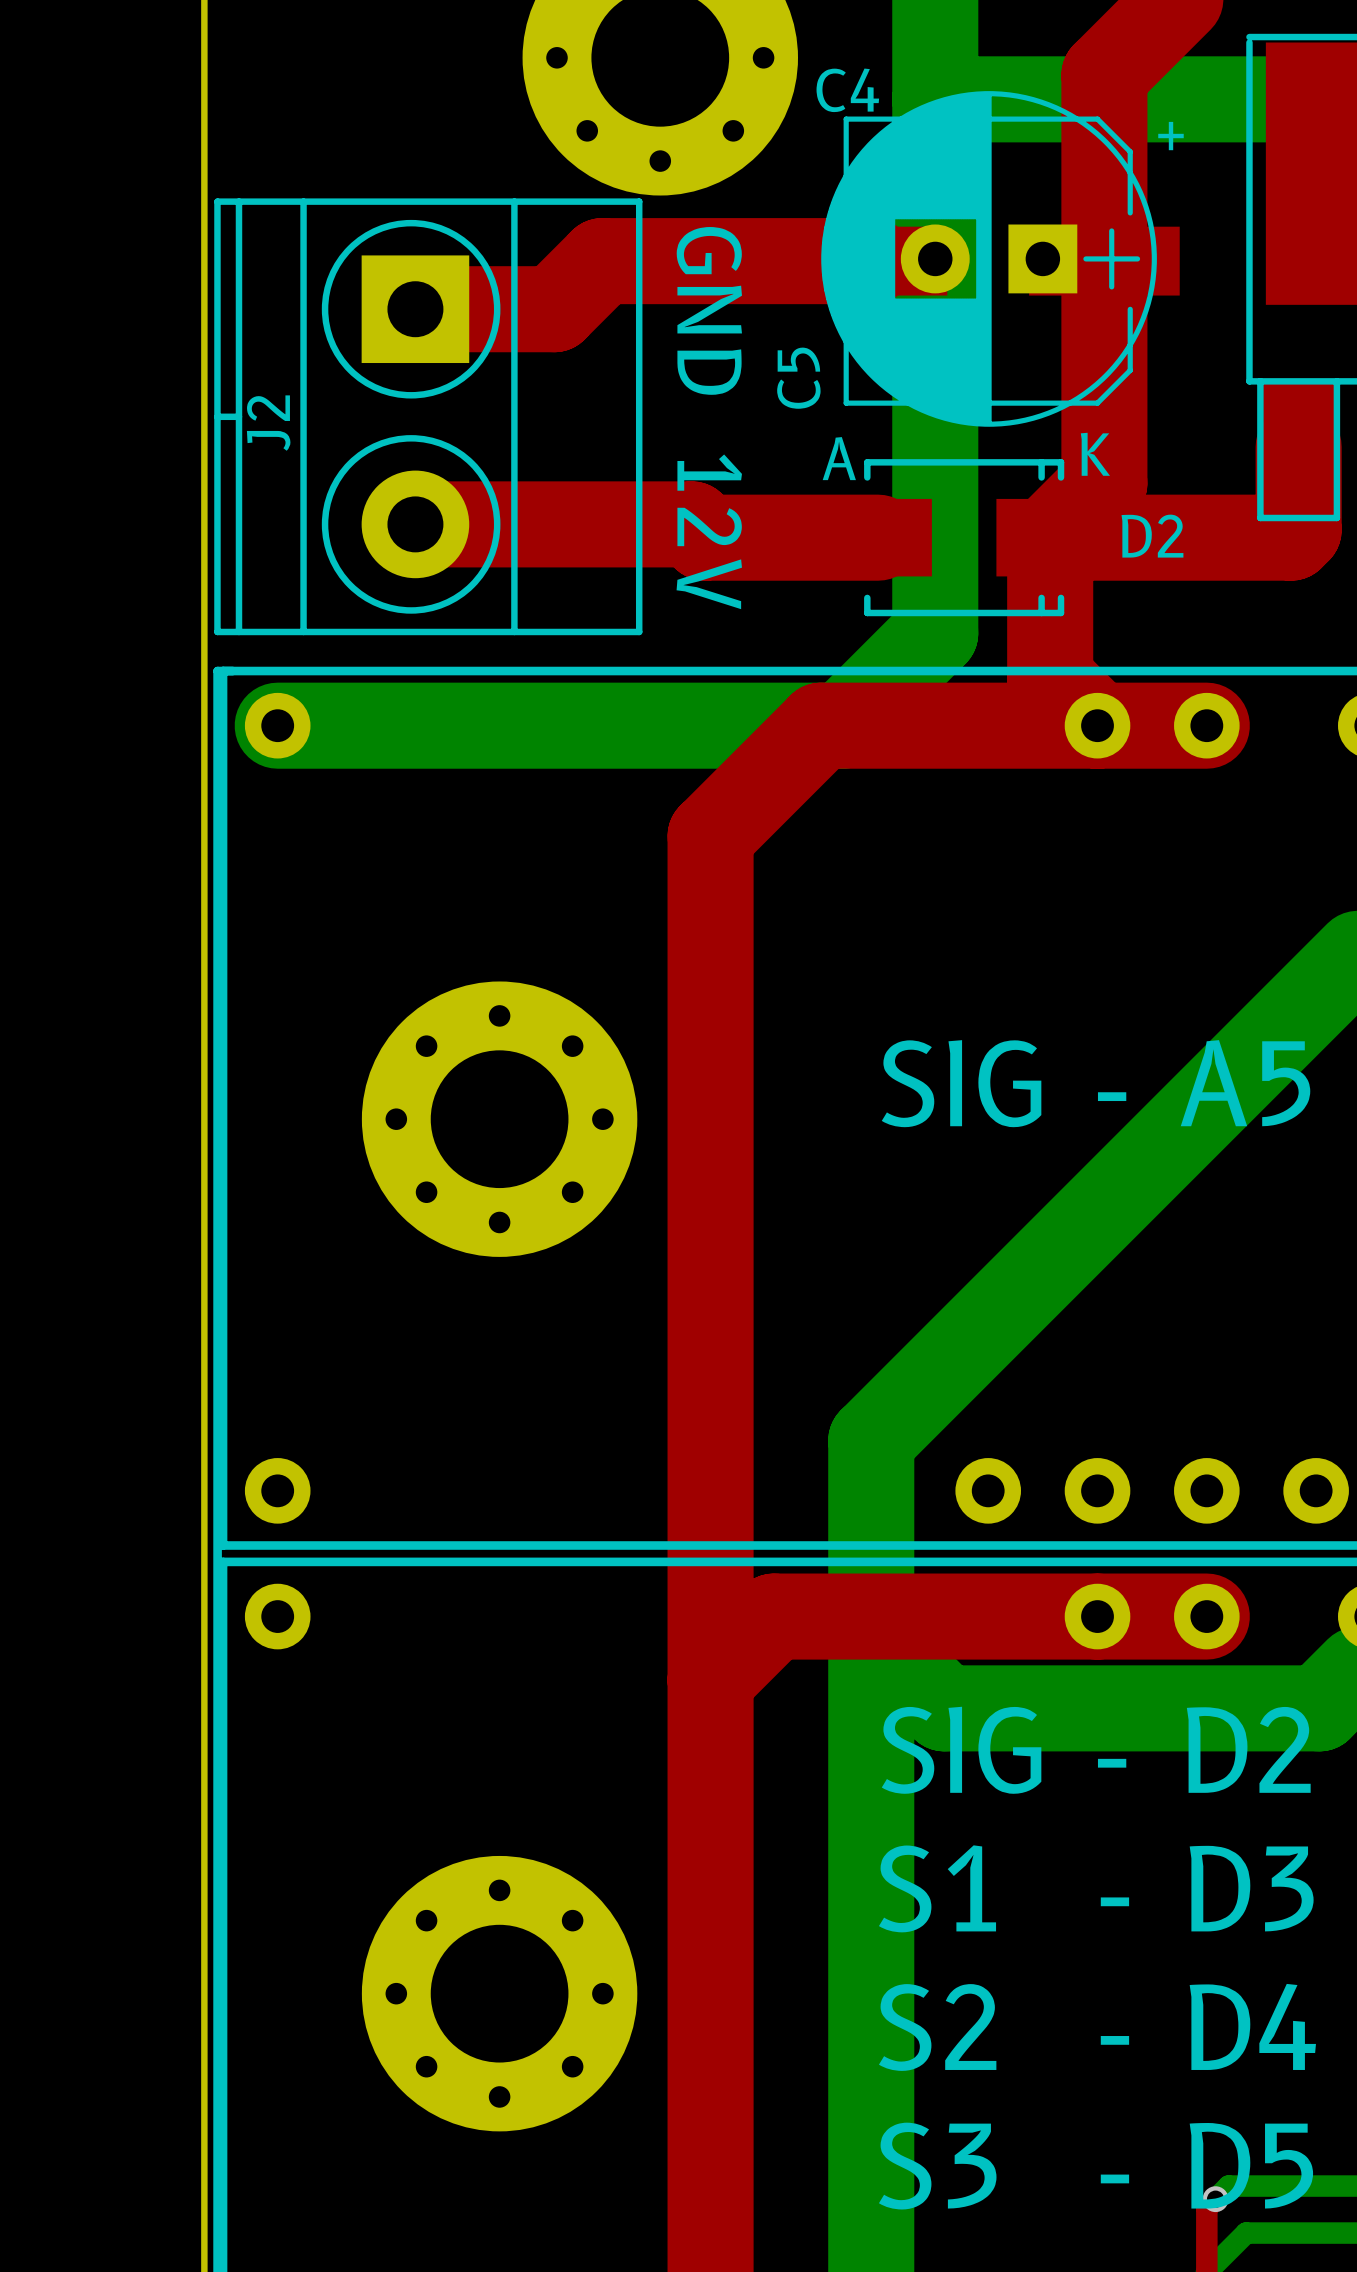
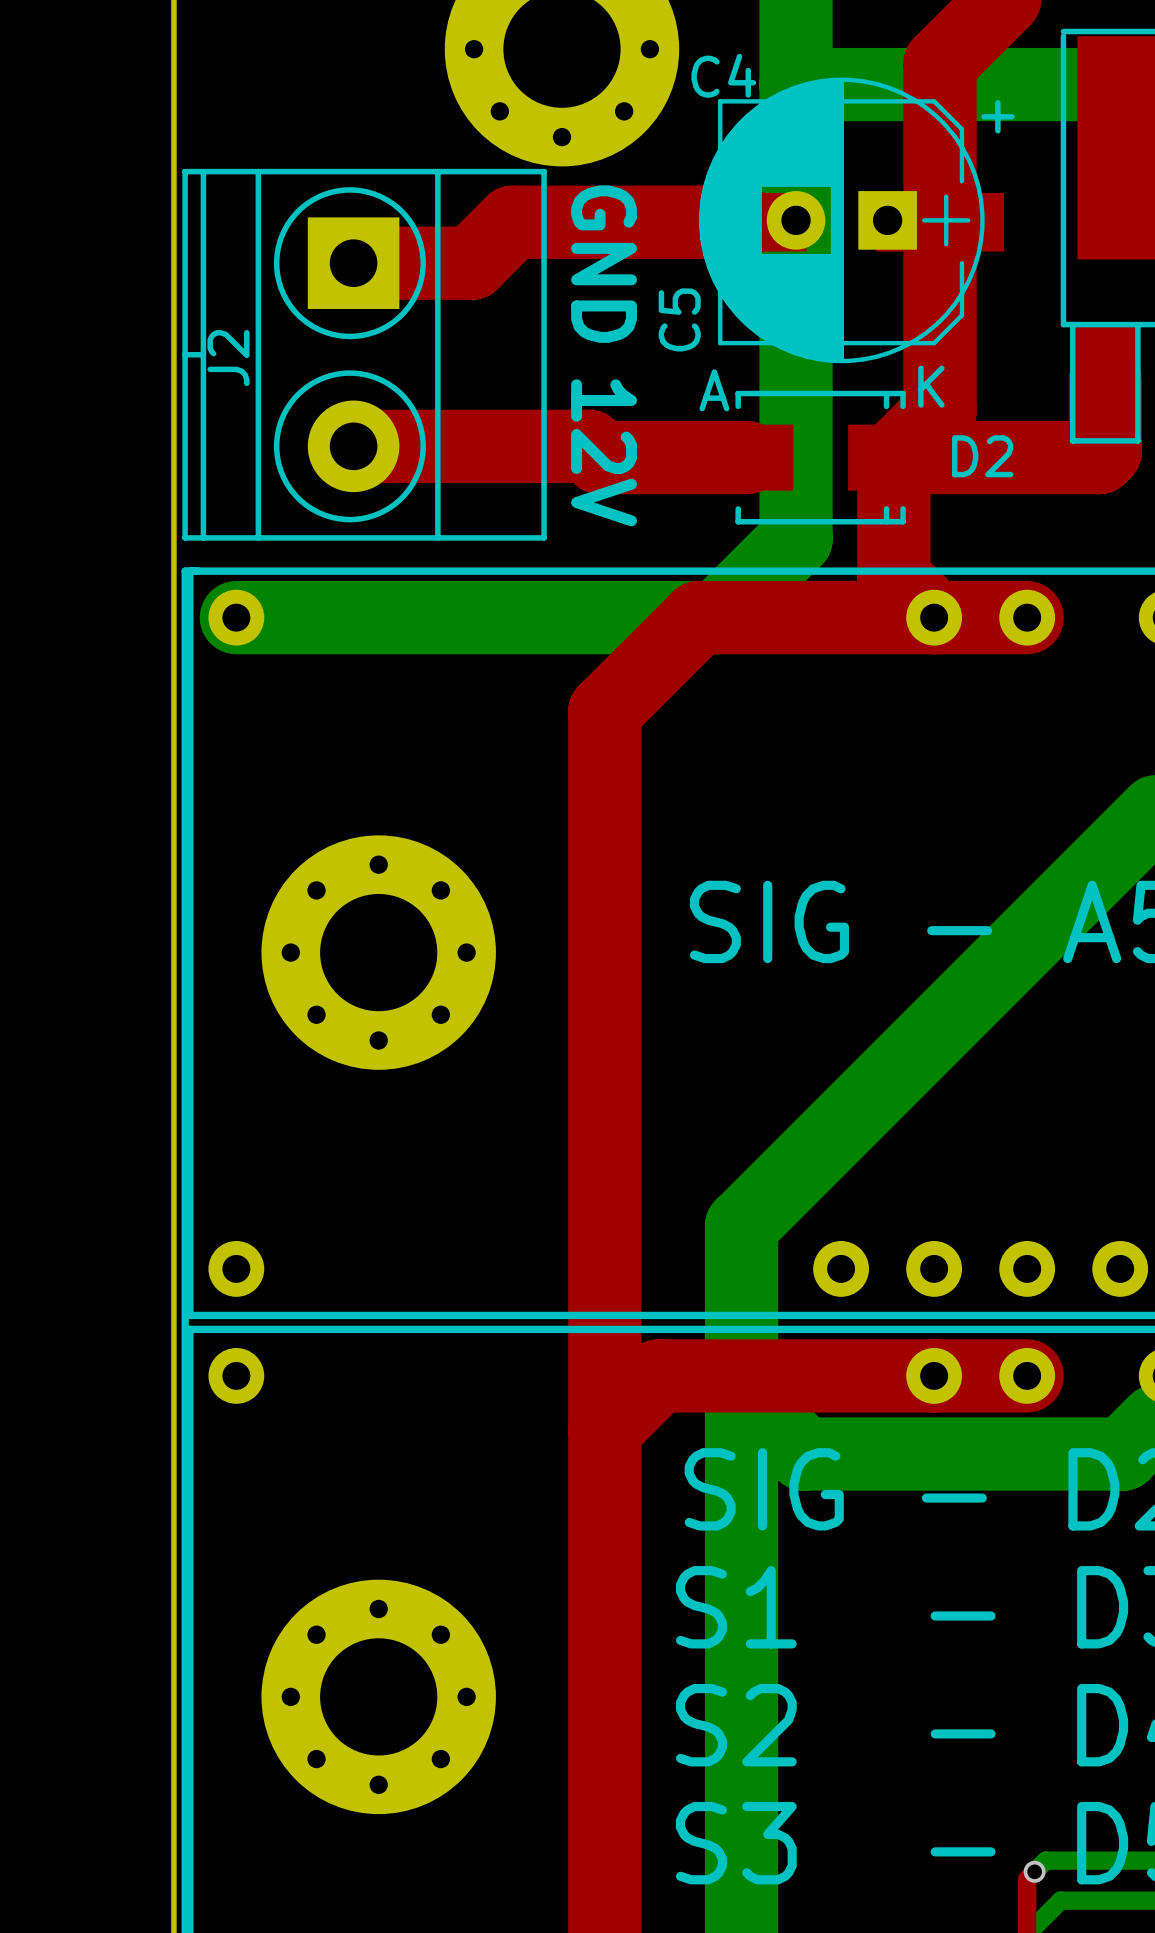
part position: (499, 1119) -> (378, 952)
part position: (499, 1993) -> (378, 1696)

